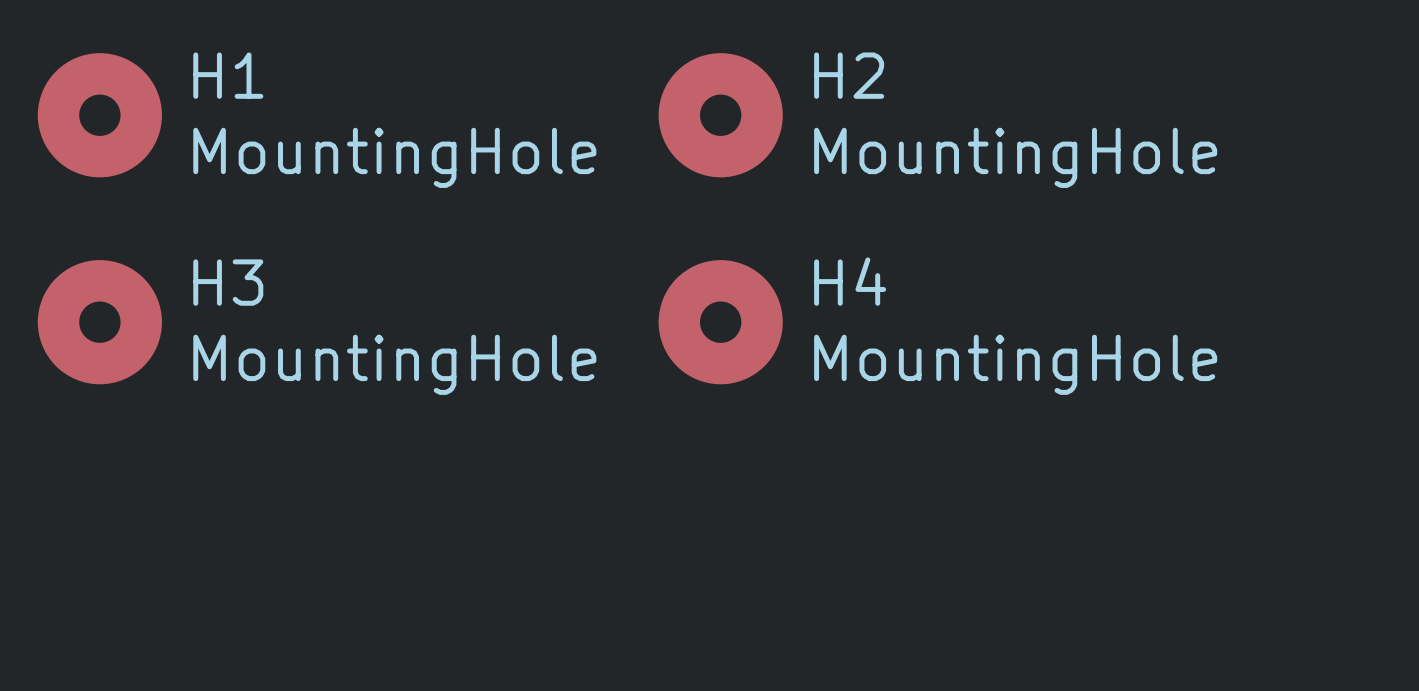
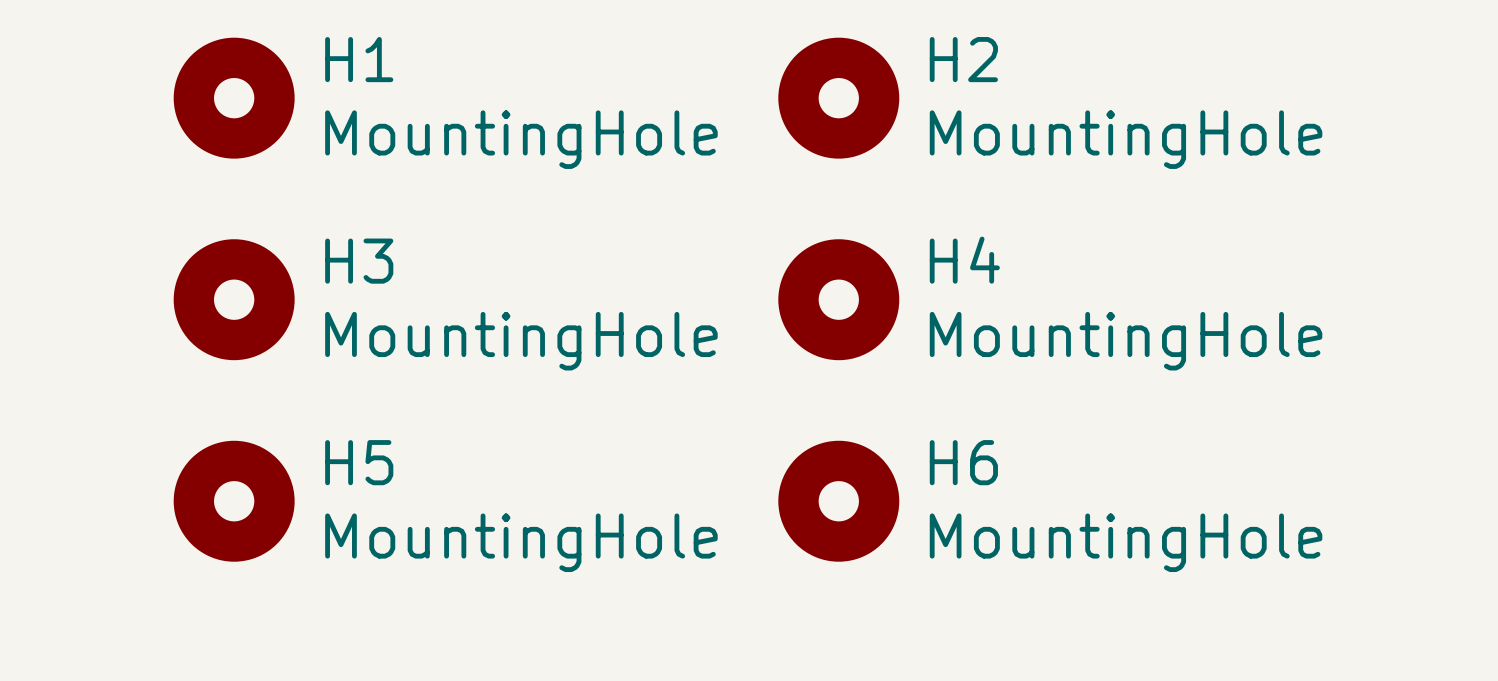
H5: none -> MountingHole (234, 501)
H6: none -> MountingHole (838, 501)

